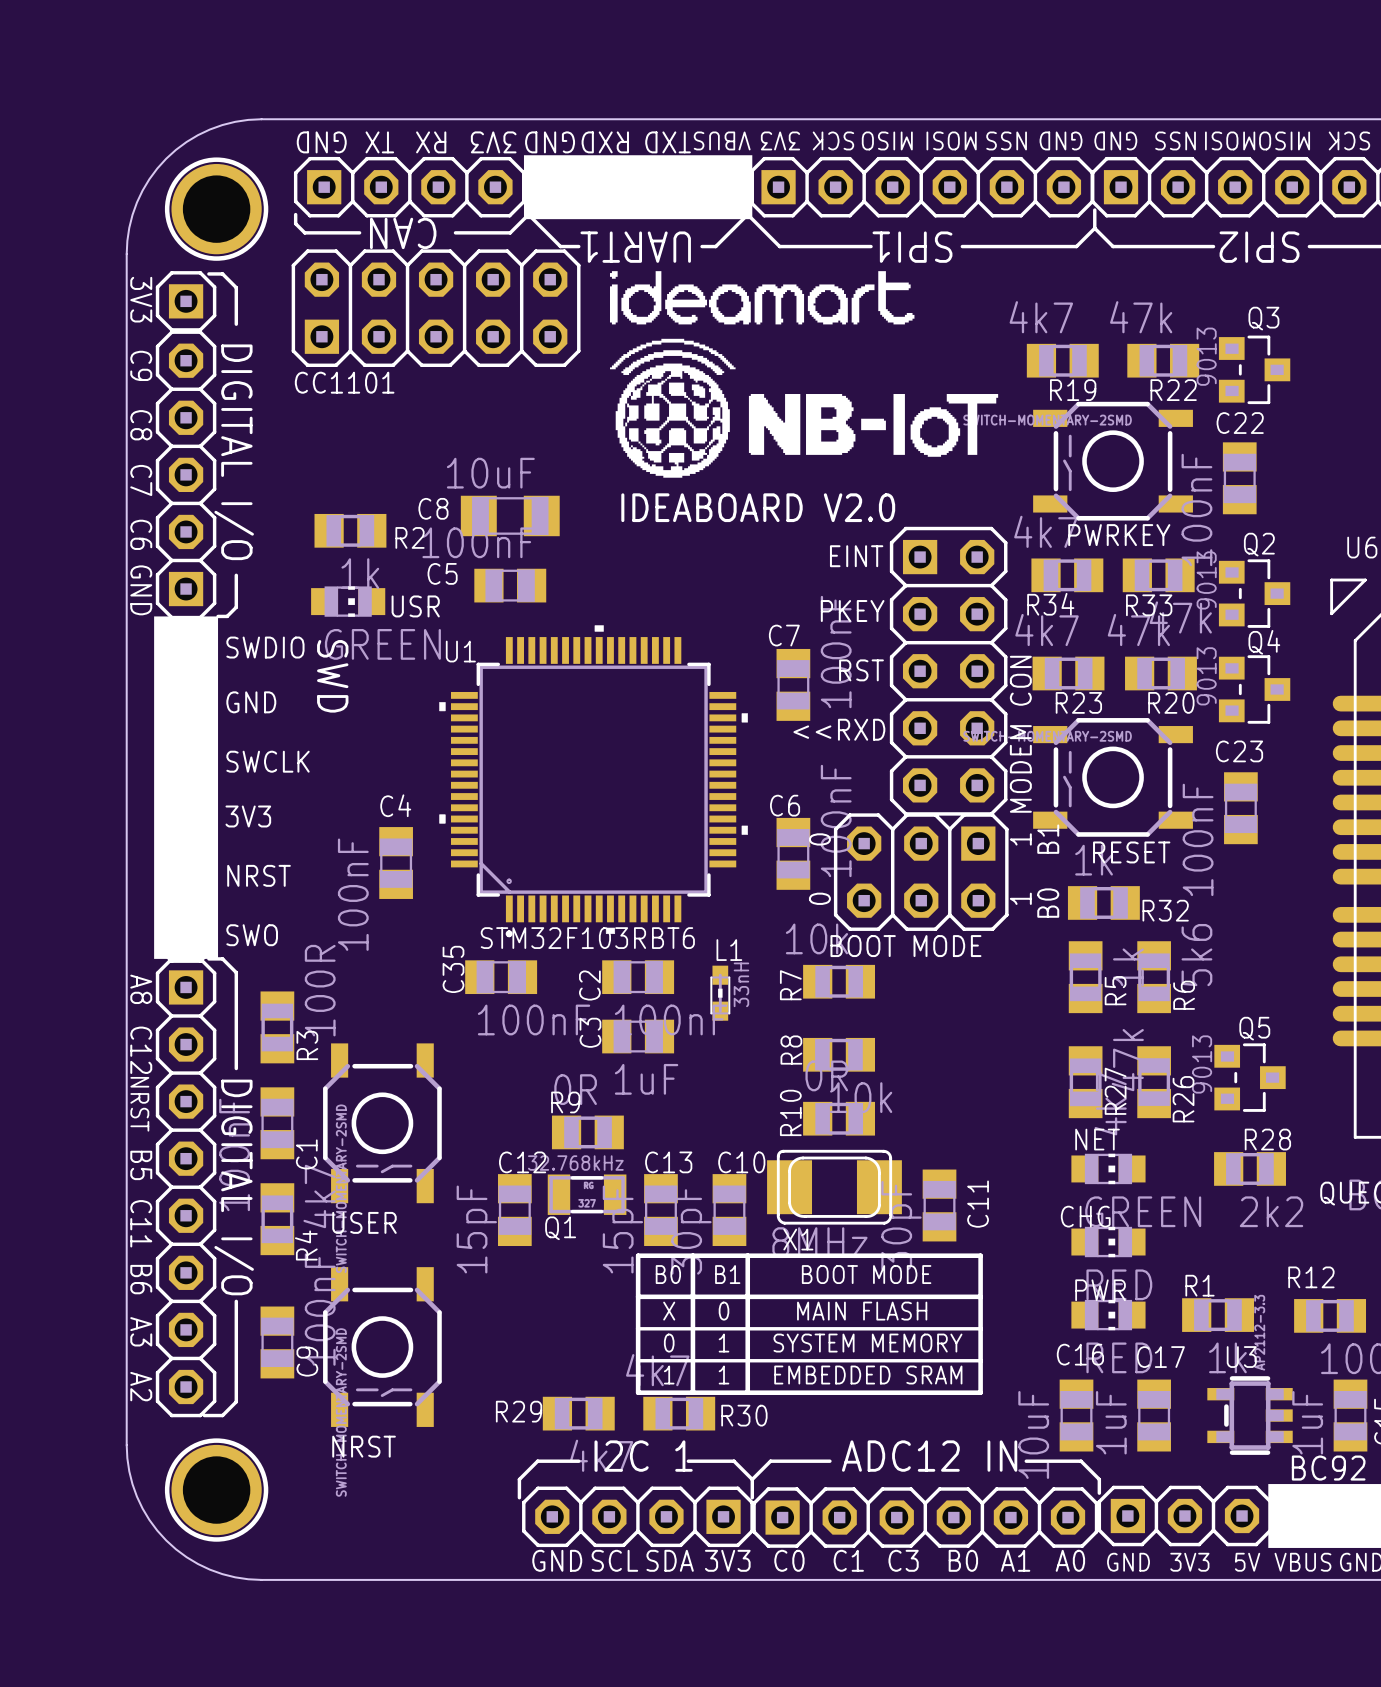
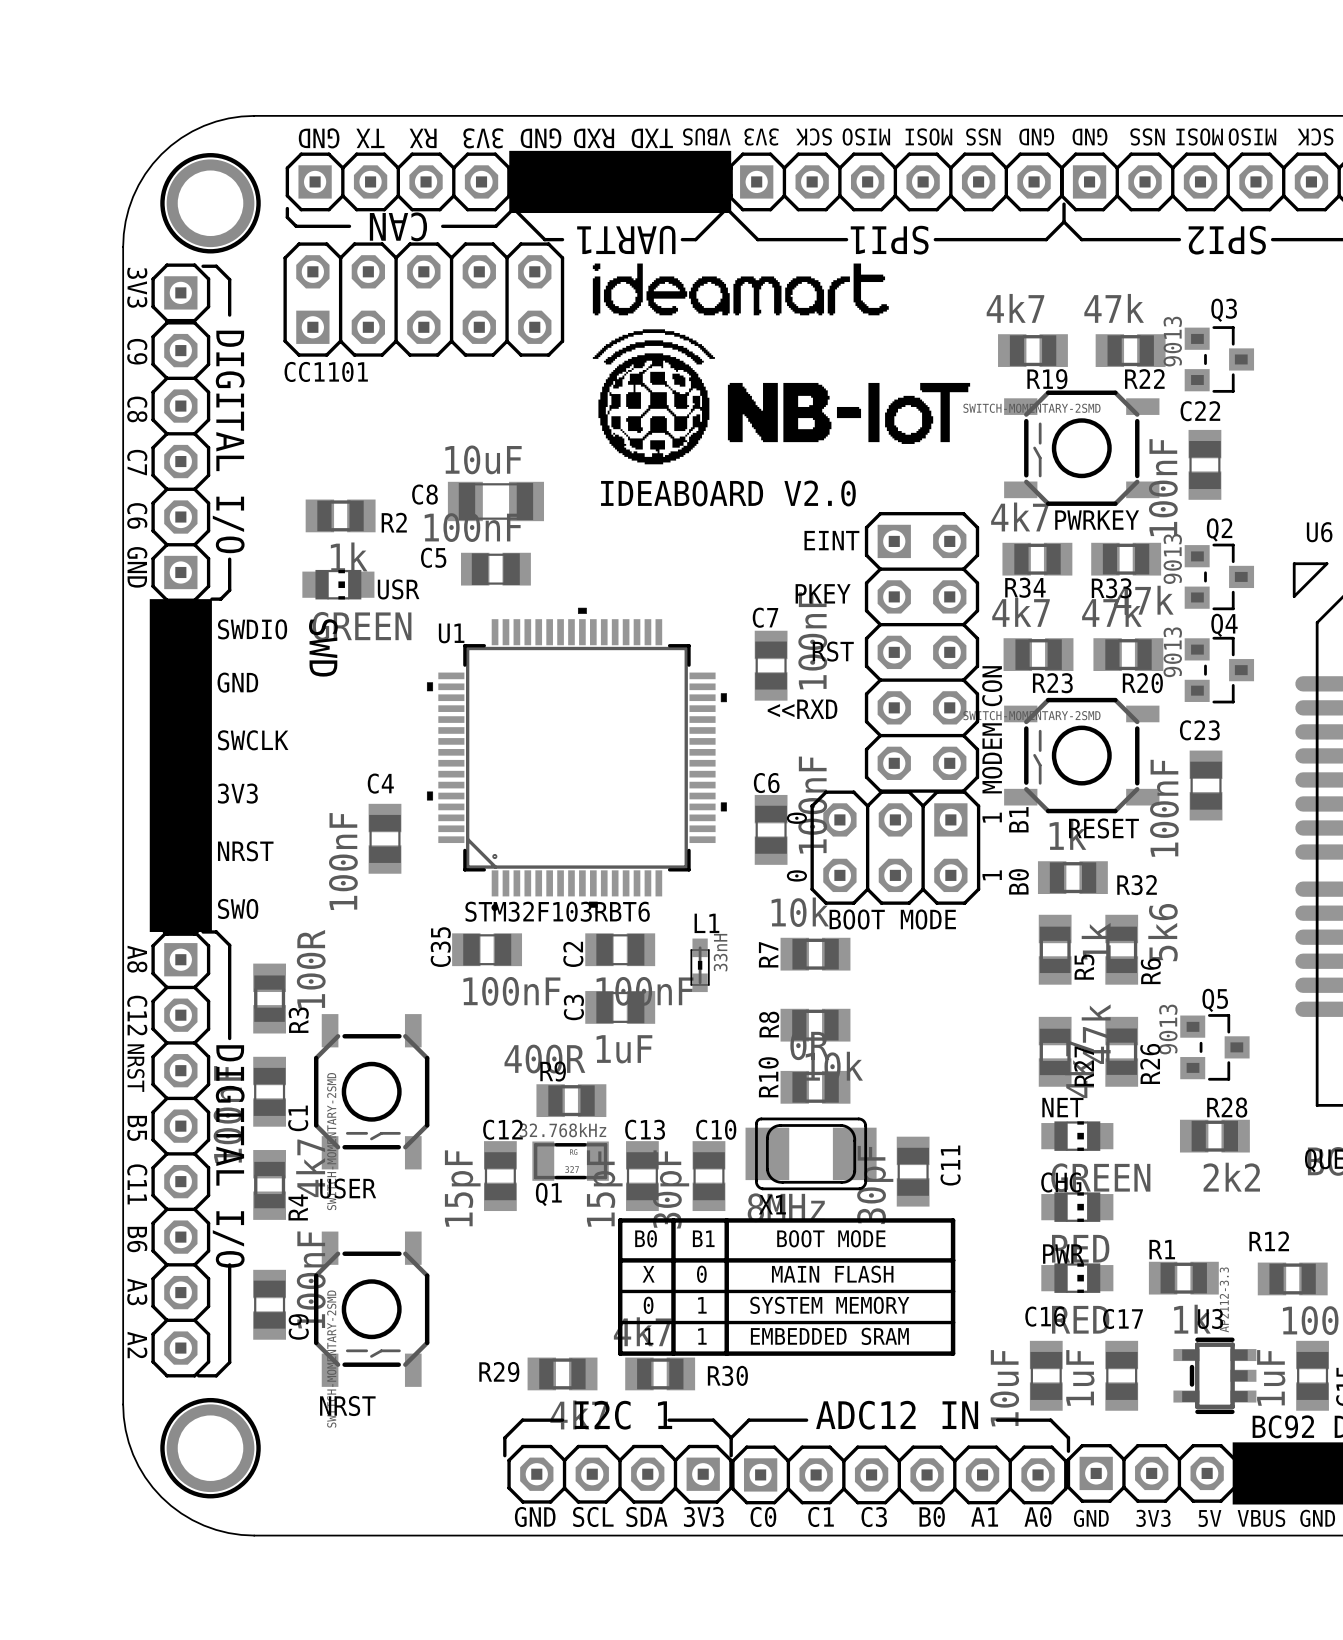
R9 value: 0R (575, 1089) -> 400R (544, 1059)

